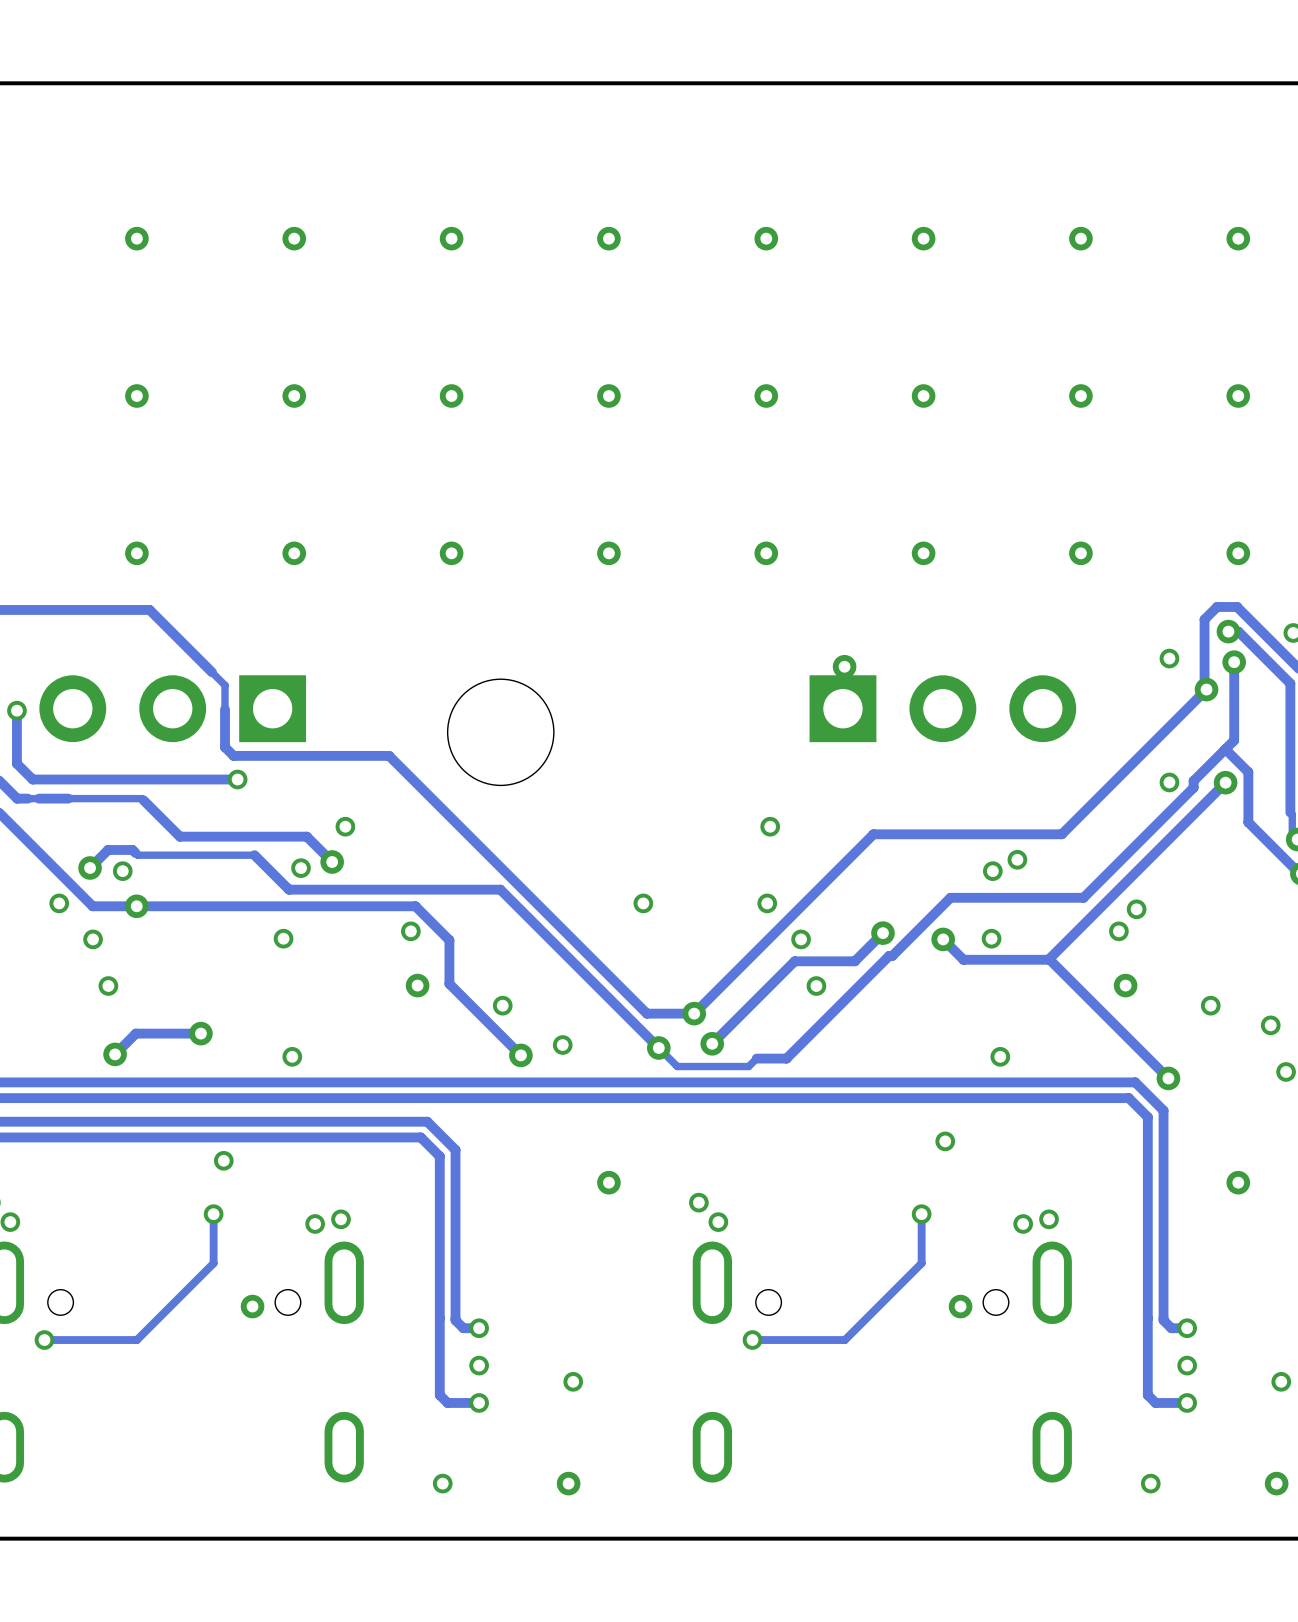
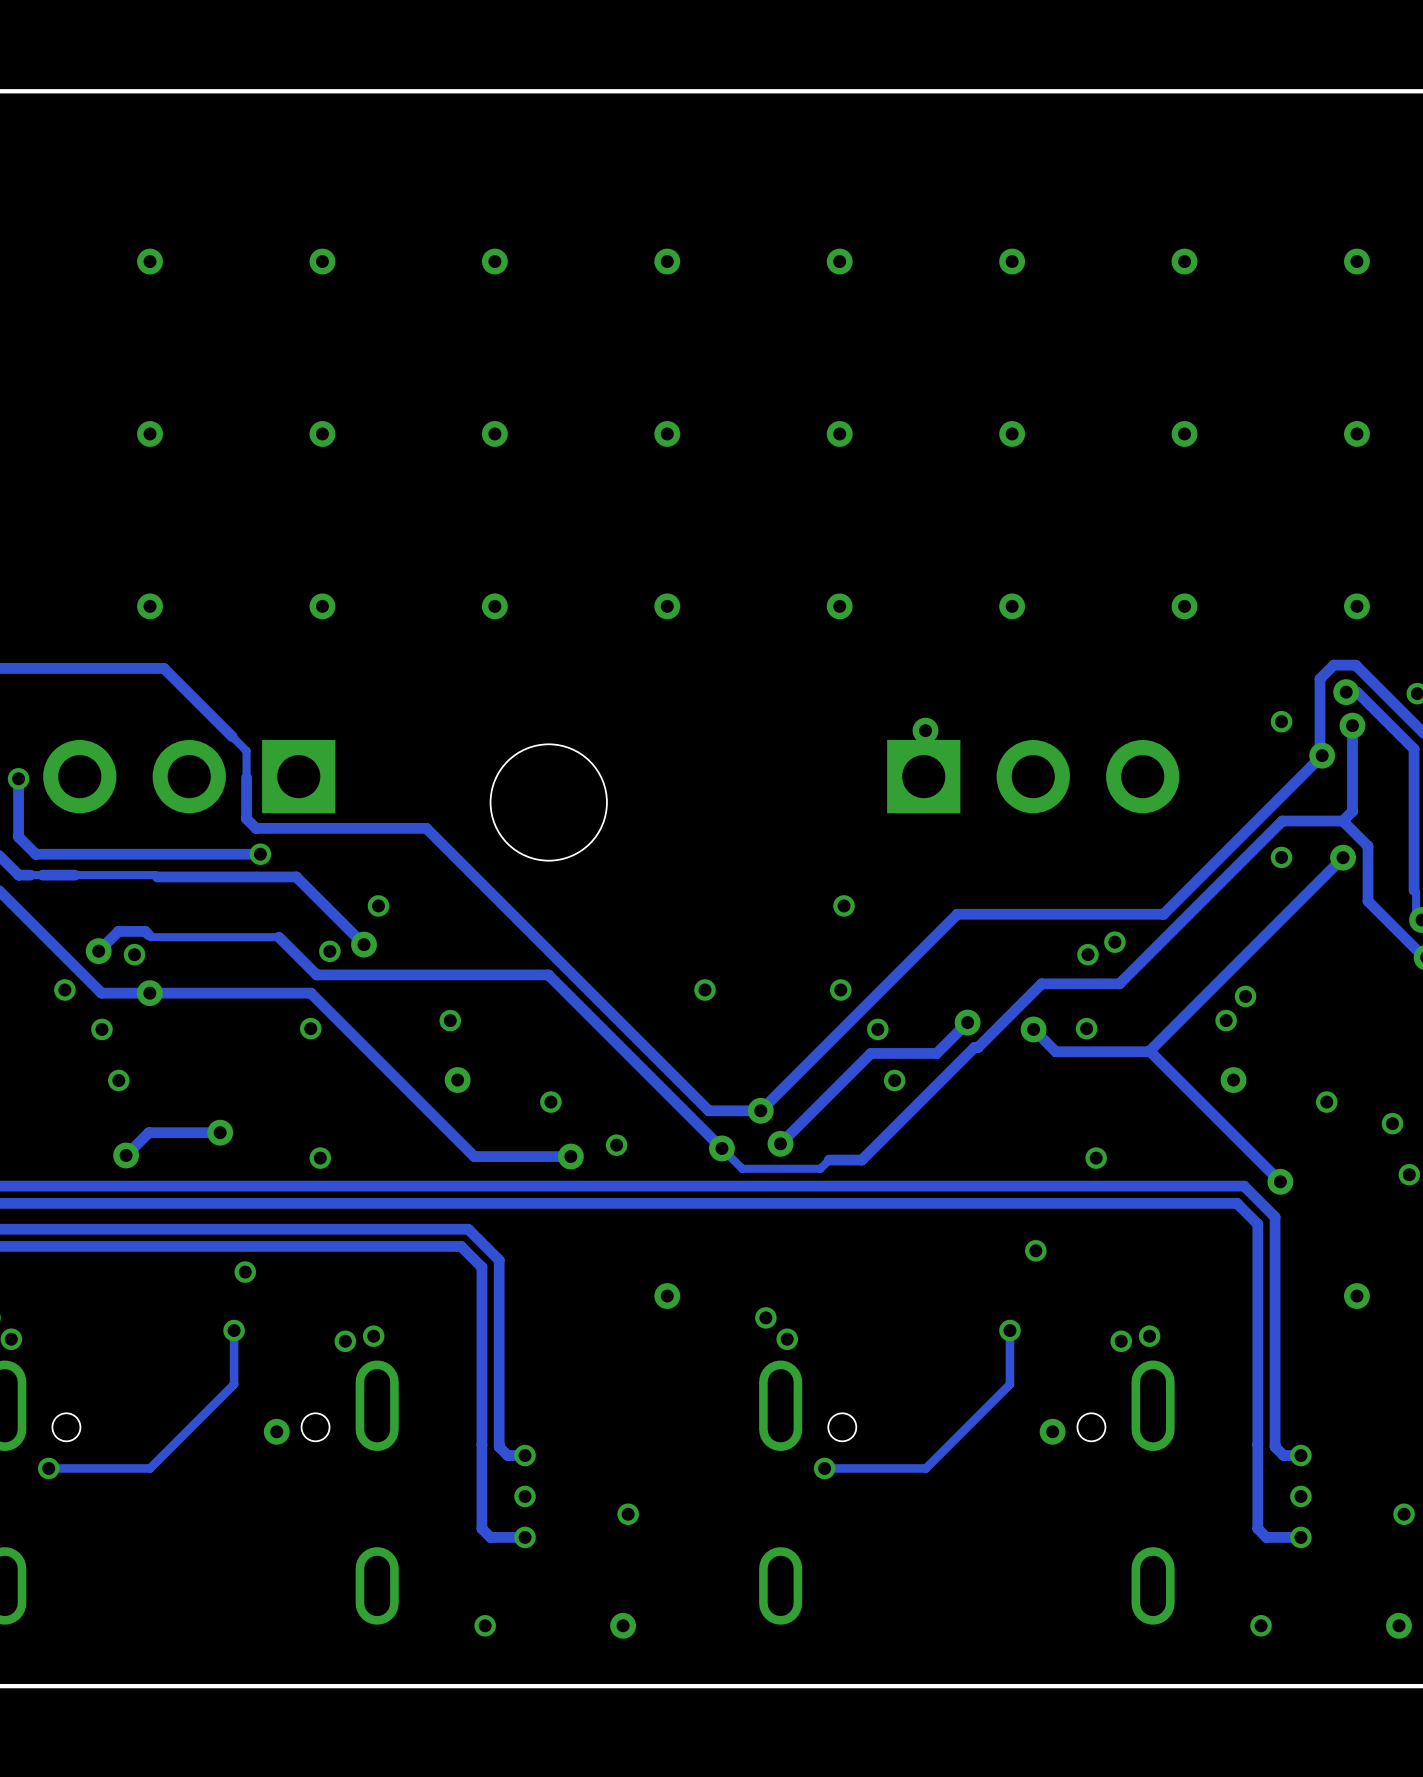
track: (1225, 749) (1193, 781) (1193, 787) (1083, 897) (1021, 897) -> (1342, 821) (1282, 821) (1119, 983)
track: (143, 800) (179, 836) (306, 836) -> (157, 876) (296, 876) (336, 916)
track: (283, 906) (415, 906) (449, 940) (449, 983) (520, 1055) -> (310, 993) (474, 1156) (570, 1156)

